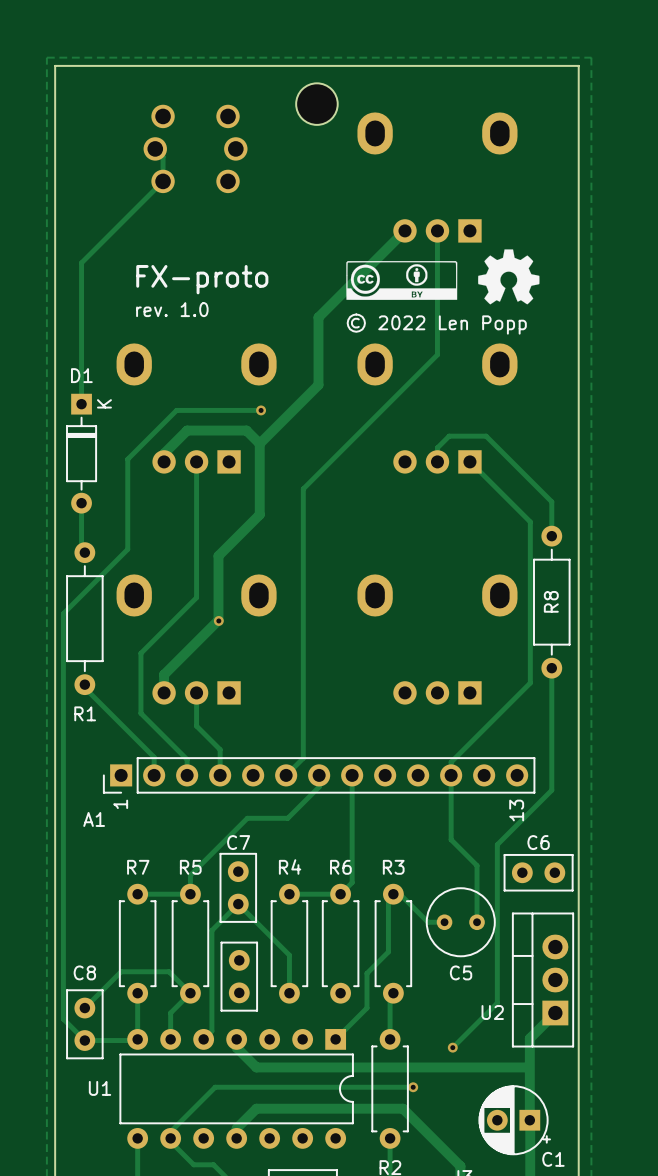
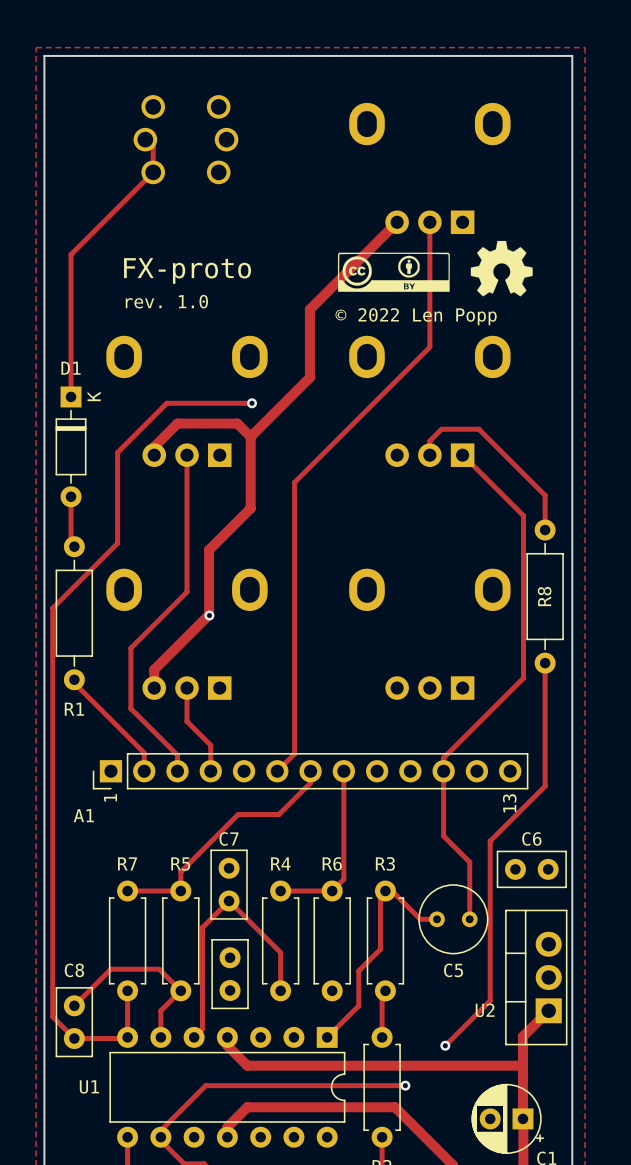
part: (316, 104) -> none

